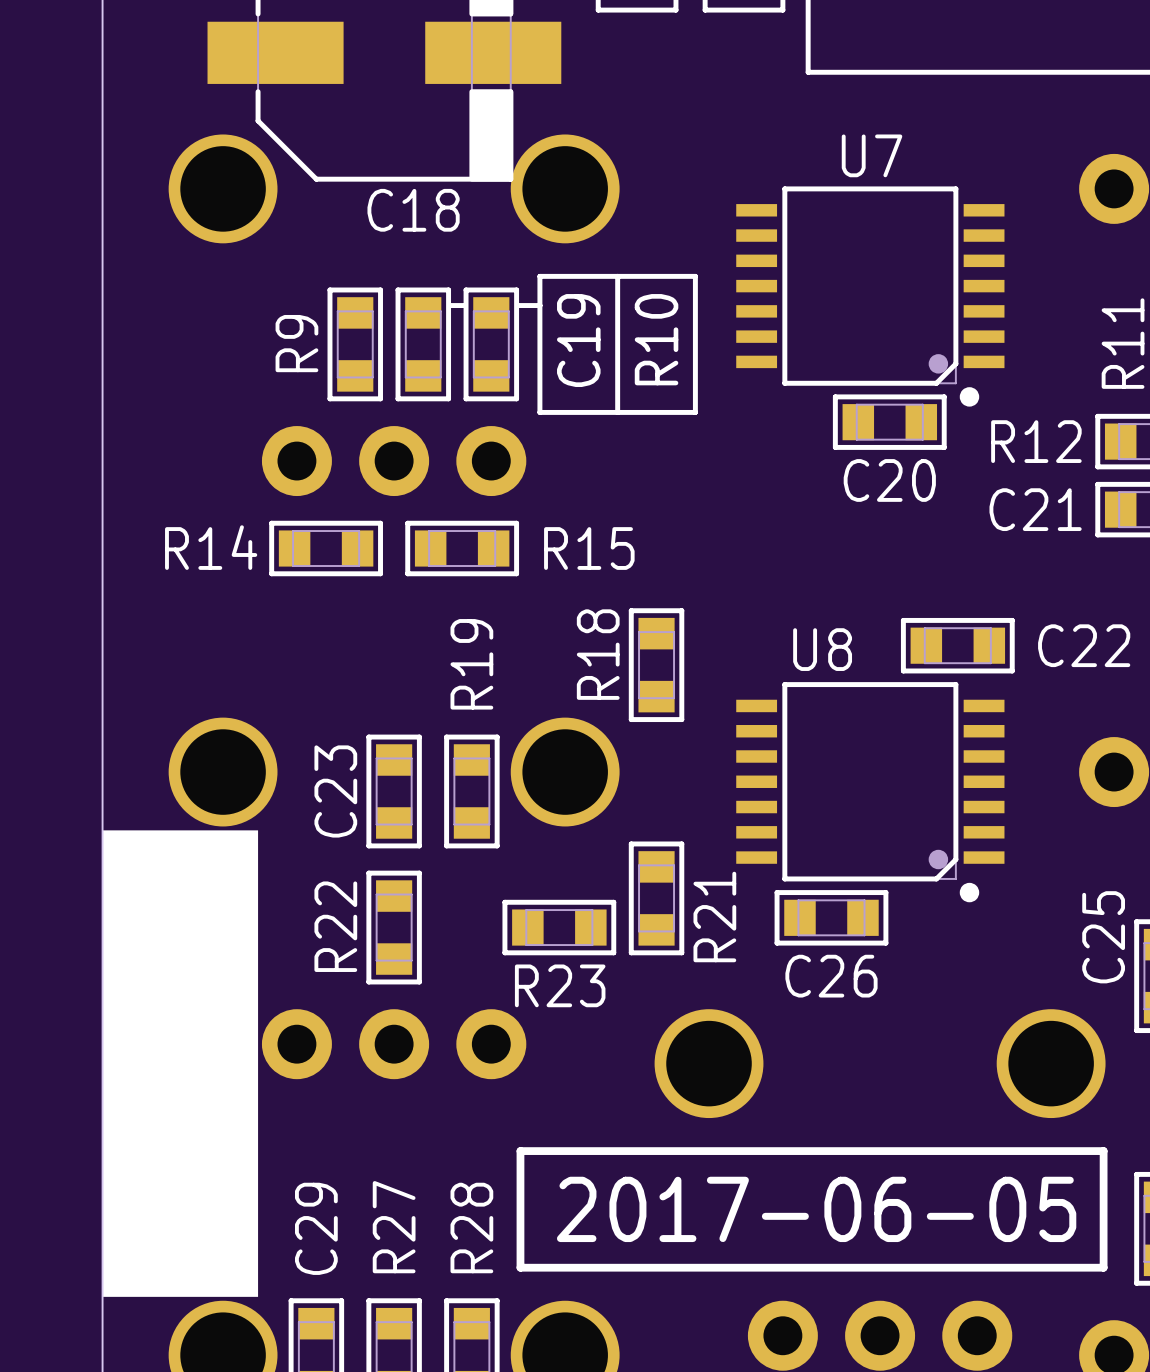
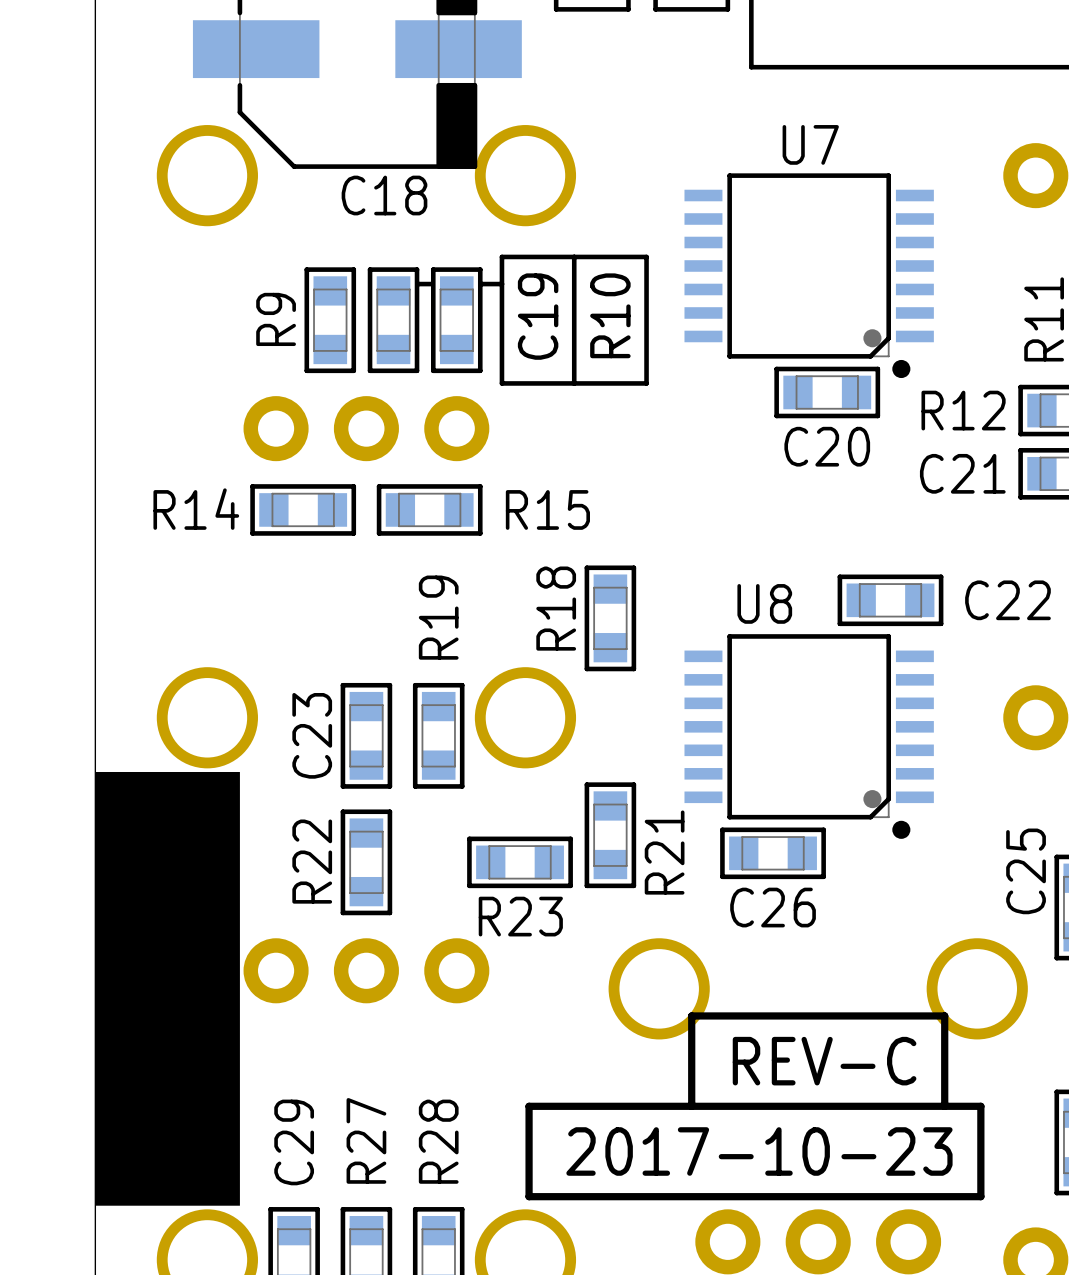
text: none -> REV-C (824, 1061)
line: (1103, 1151) (1103, 1267) (520, 1267) (520, 1151) (1103, 1151) -> (980, 1106) (980, 1196) (529, 1196) (529, 1106) (980, 1106)
line: none -> (944, 1106) (944, 1015) (691, 1015) (691, 1106)
text: 2017-06-05 (816, 1209) -> 2017-10-23 (759, 1151)

